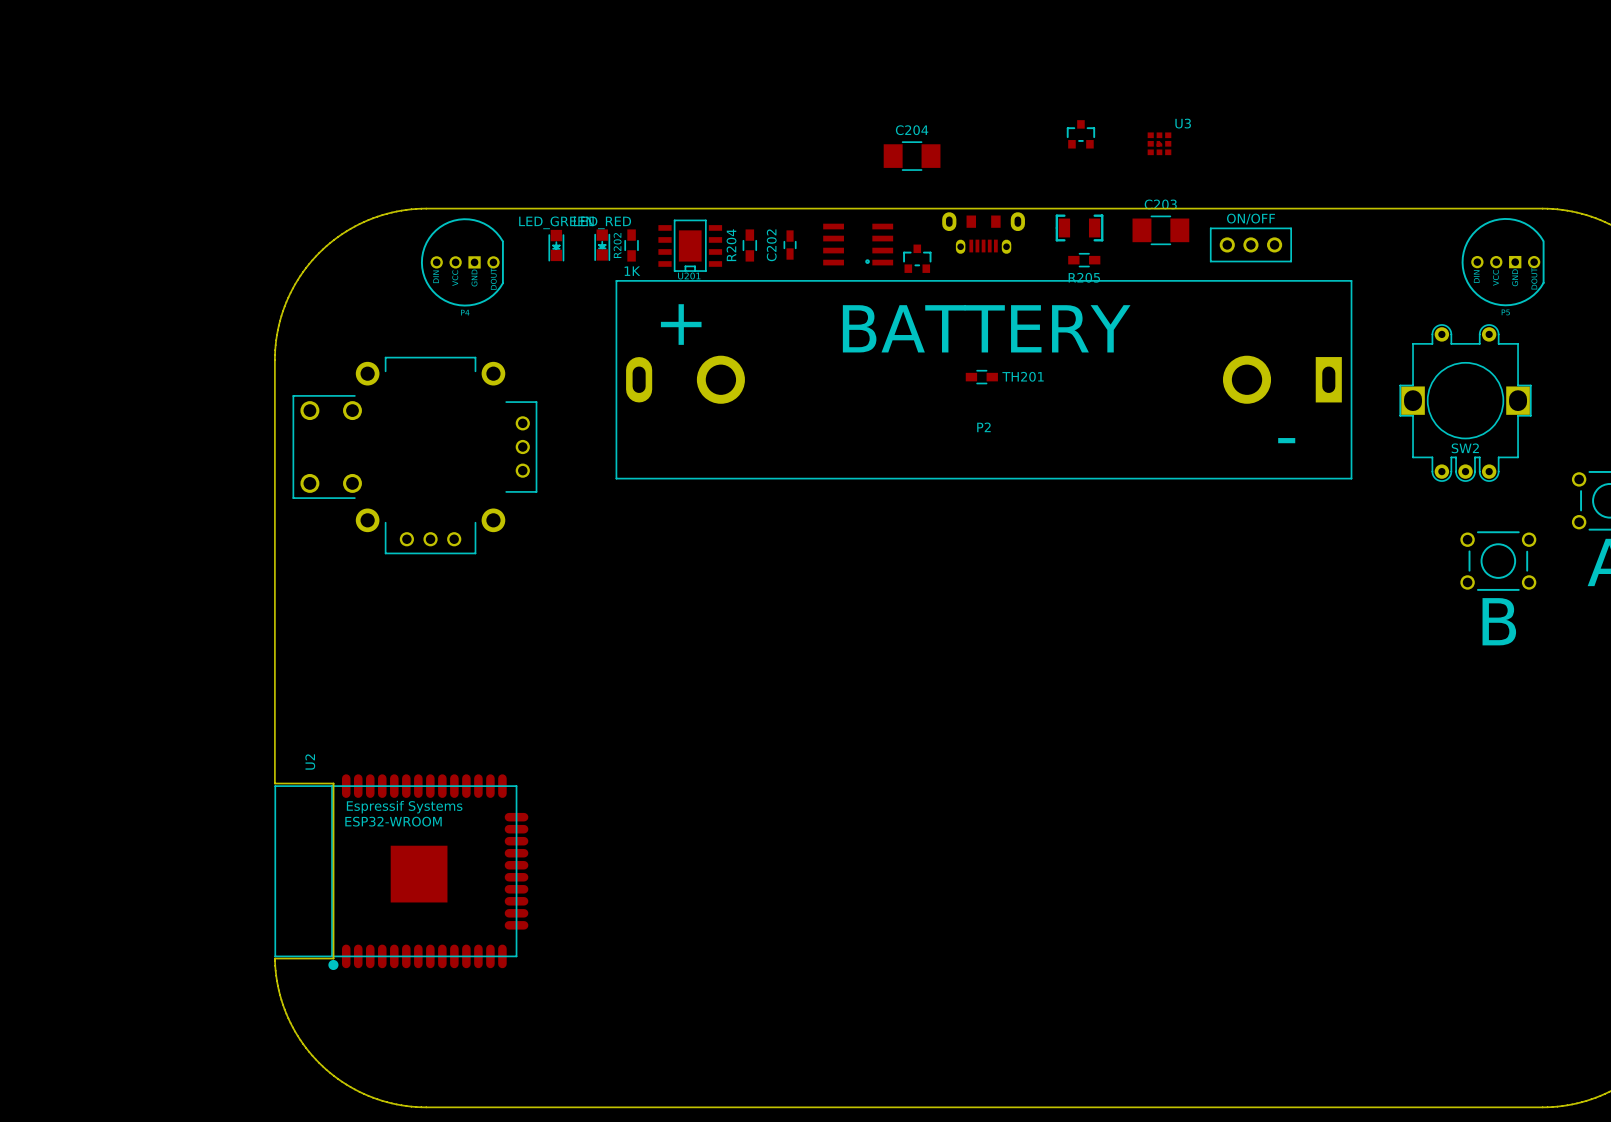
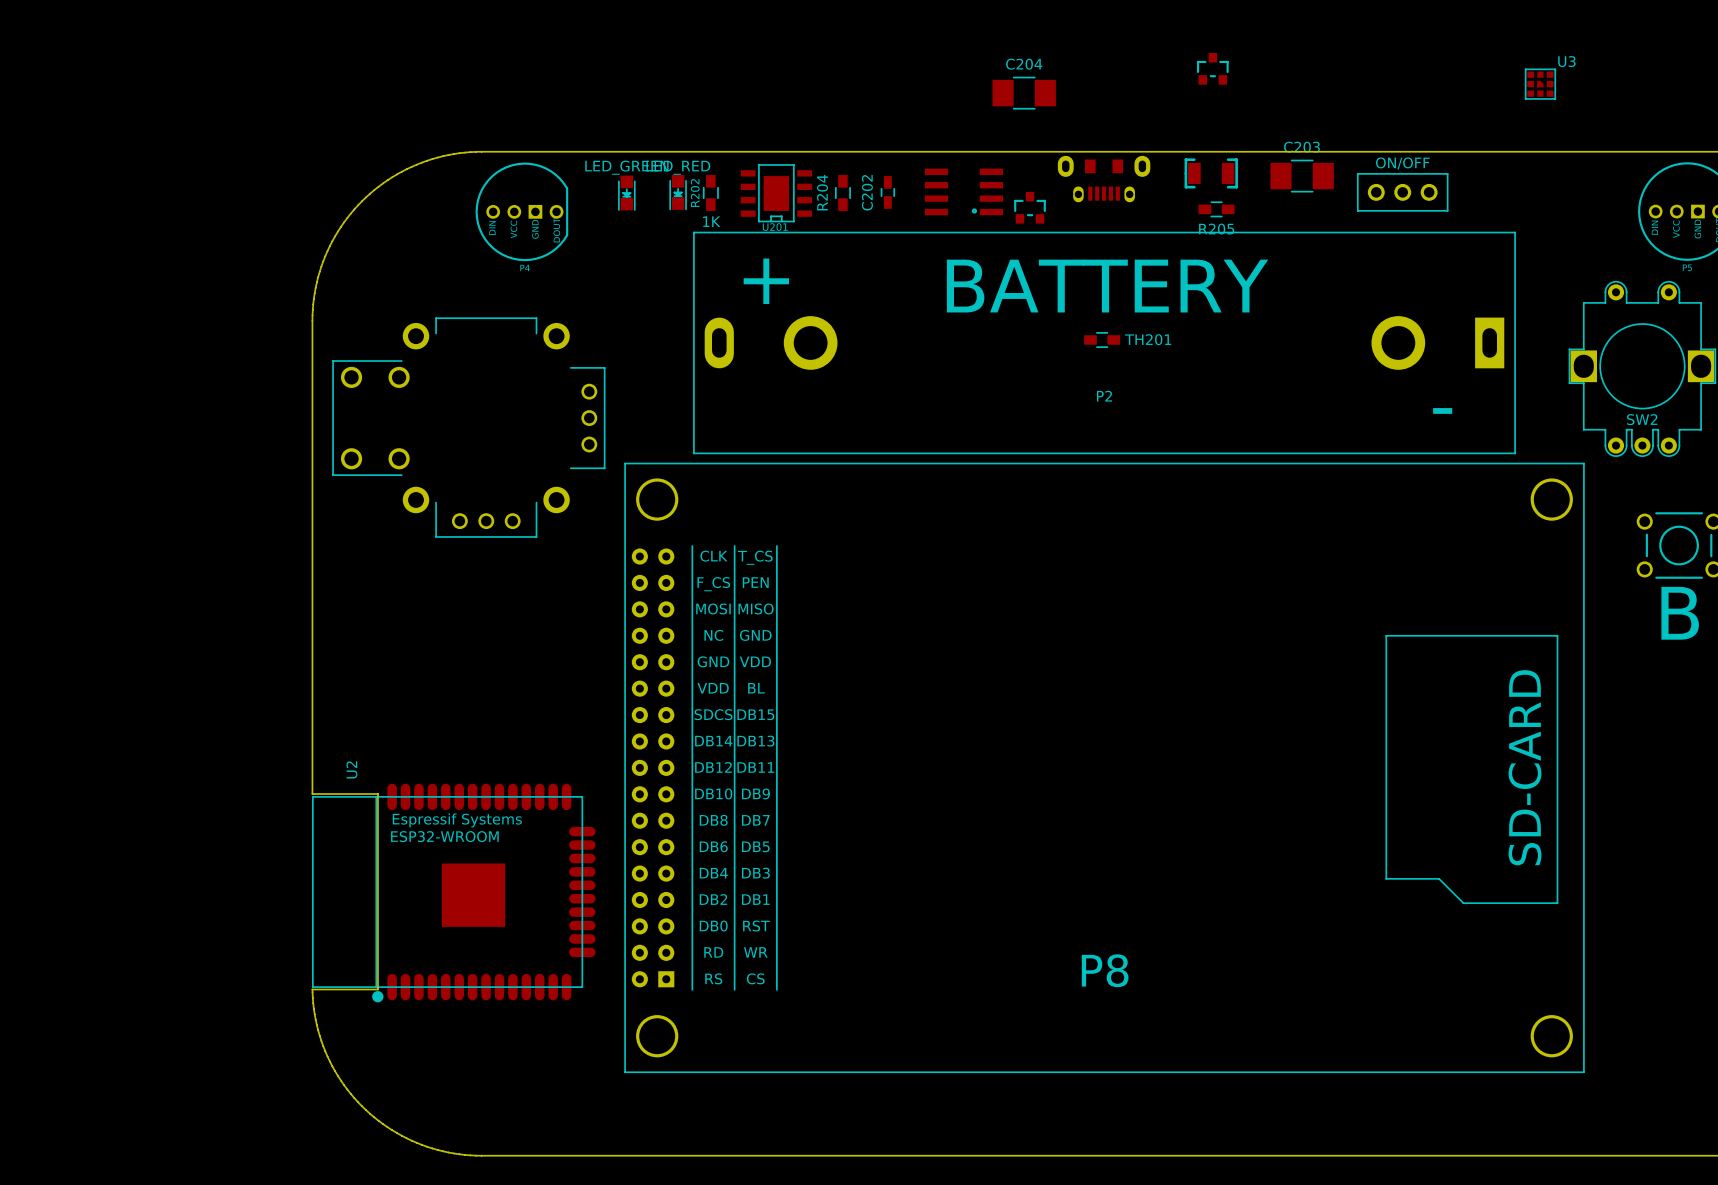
U3 footprint: [1147, 132, 1172, 156] -> [1524, 68, 1557, 100]
P8: none -> (1104, 767)

